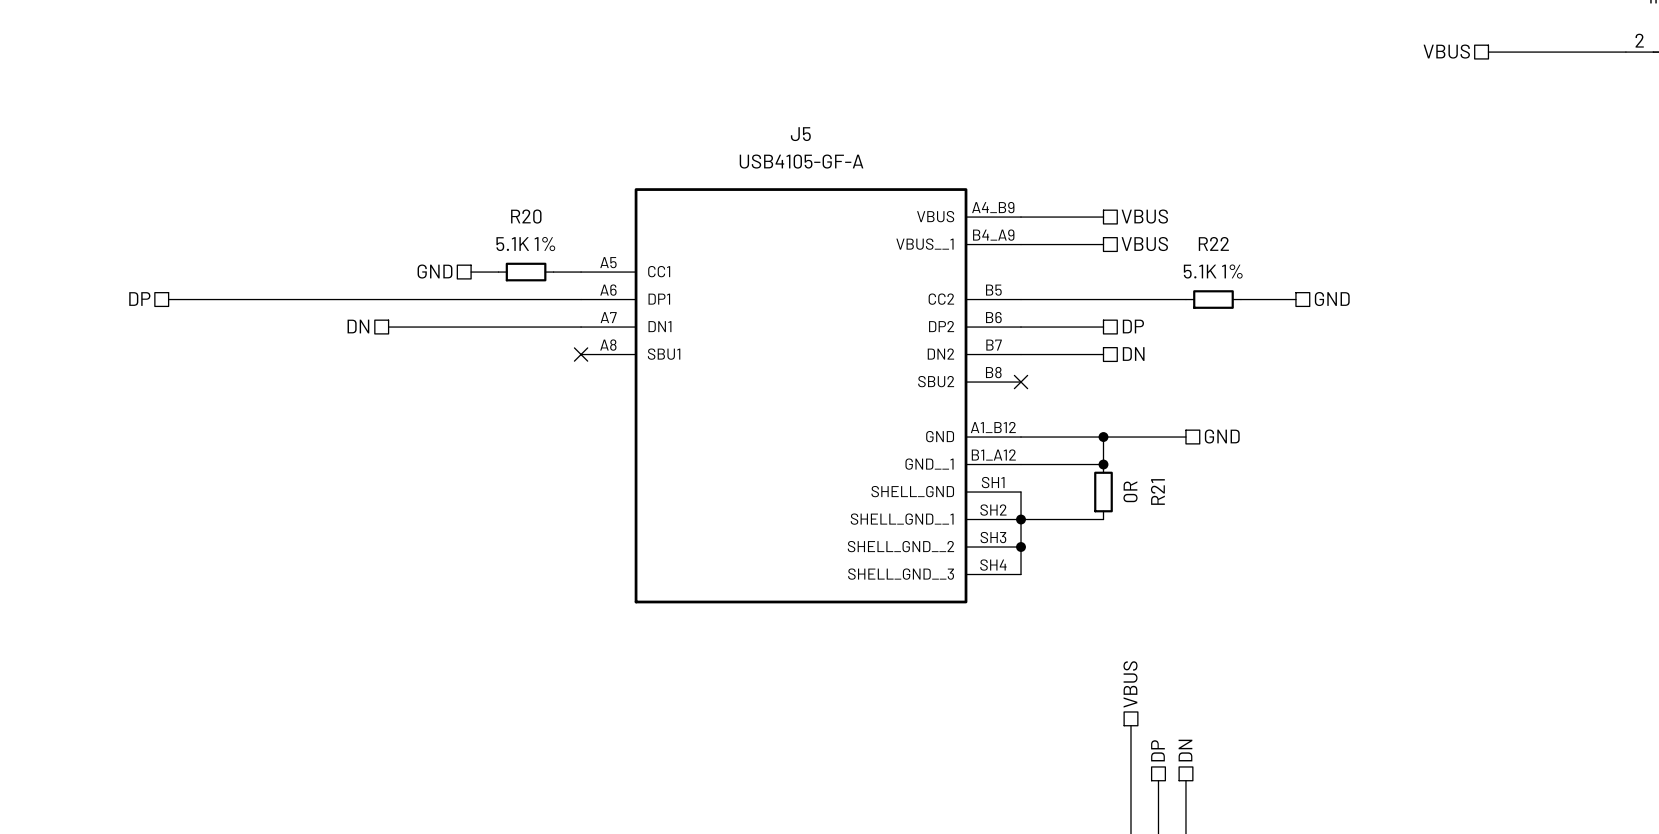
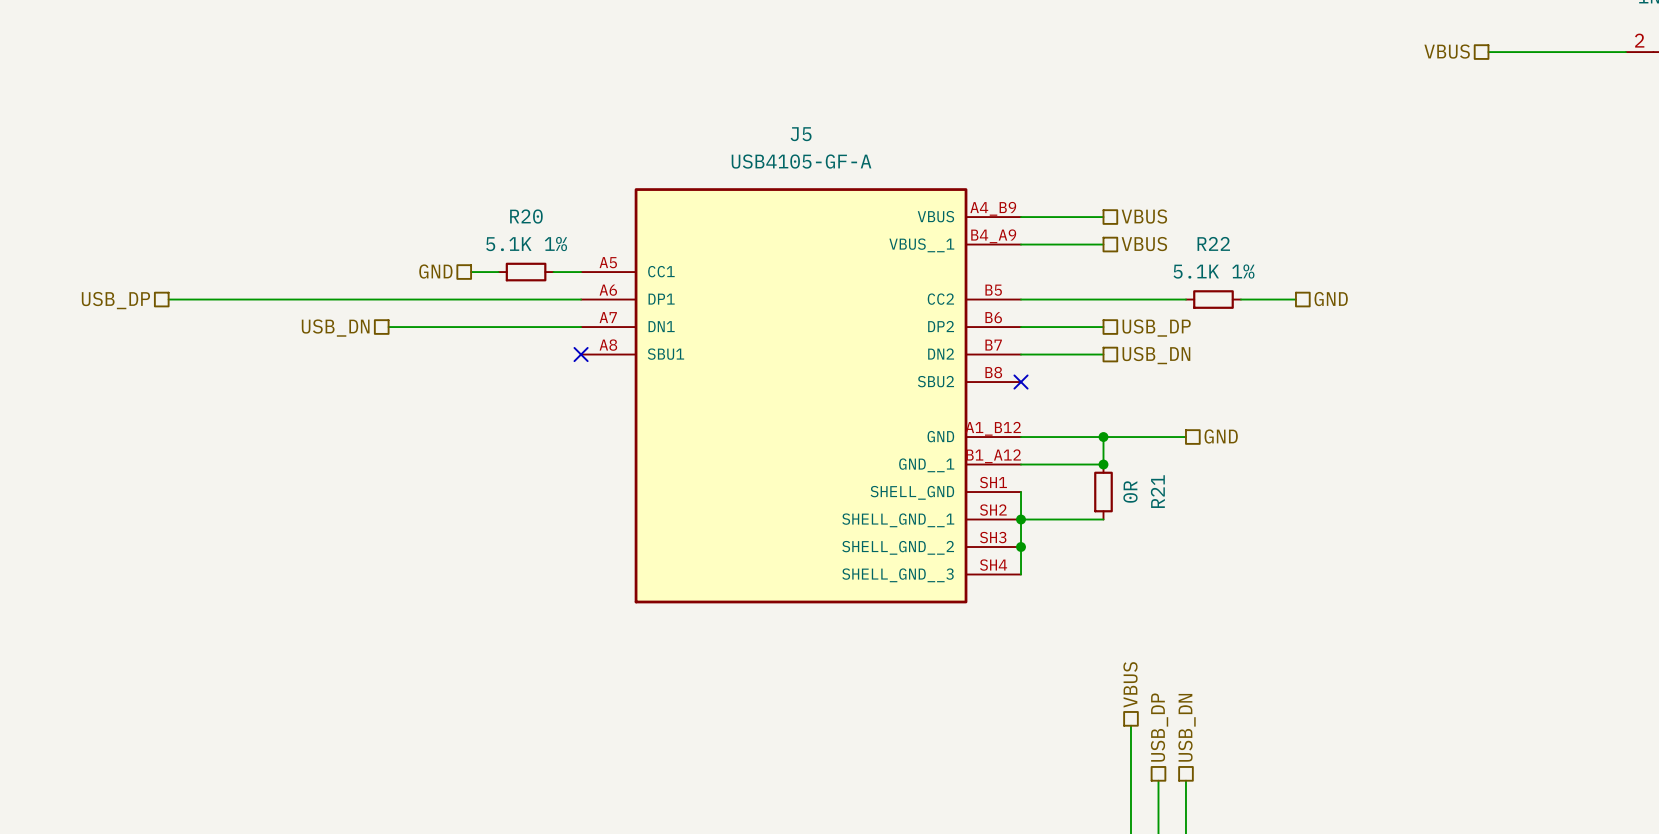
hierarchical label: DP (139, 299) -> USB_DP (115, 300)
hierarchical label: DN (358, 326) -> USB_DN (335, 328)
hierarchical label: DP (1133, 326) -> USB_DP (1156, 328)
hierarchical label: DN (1133, 354) -> USB_DN (1156, 355)
hierarchical label: DP (1157, 750) -> USB_DP (1159, 727)
hierarchical label: DN (1185, 750) -> USB_DN (1187, 727)

